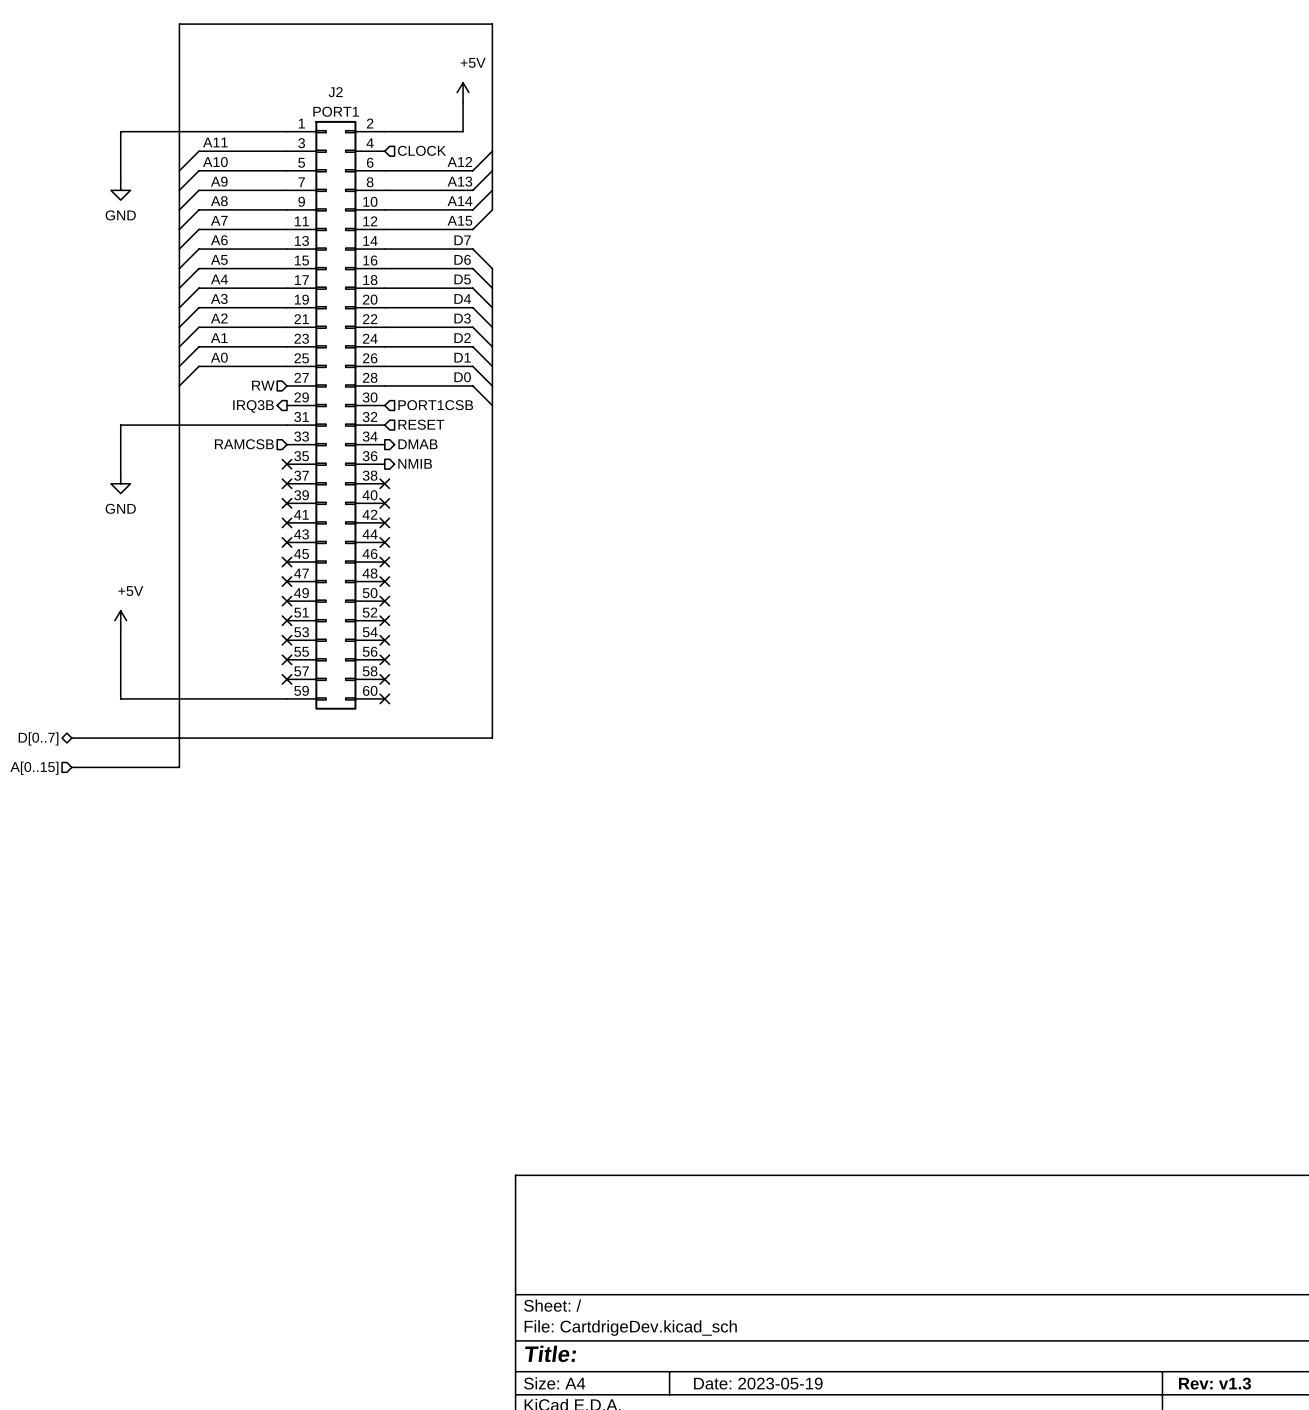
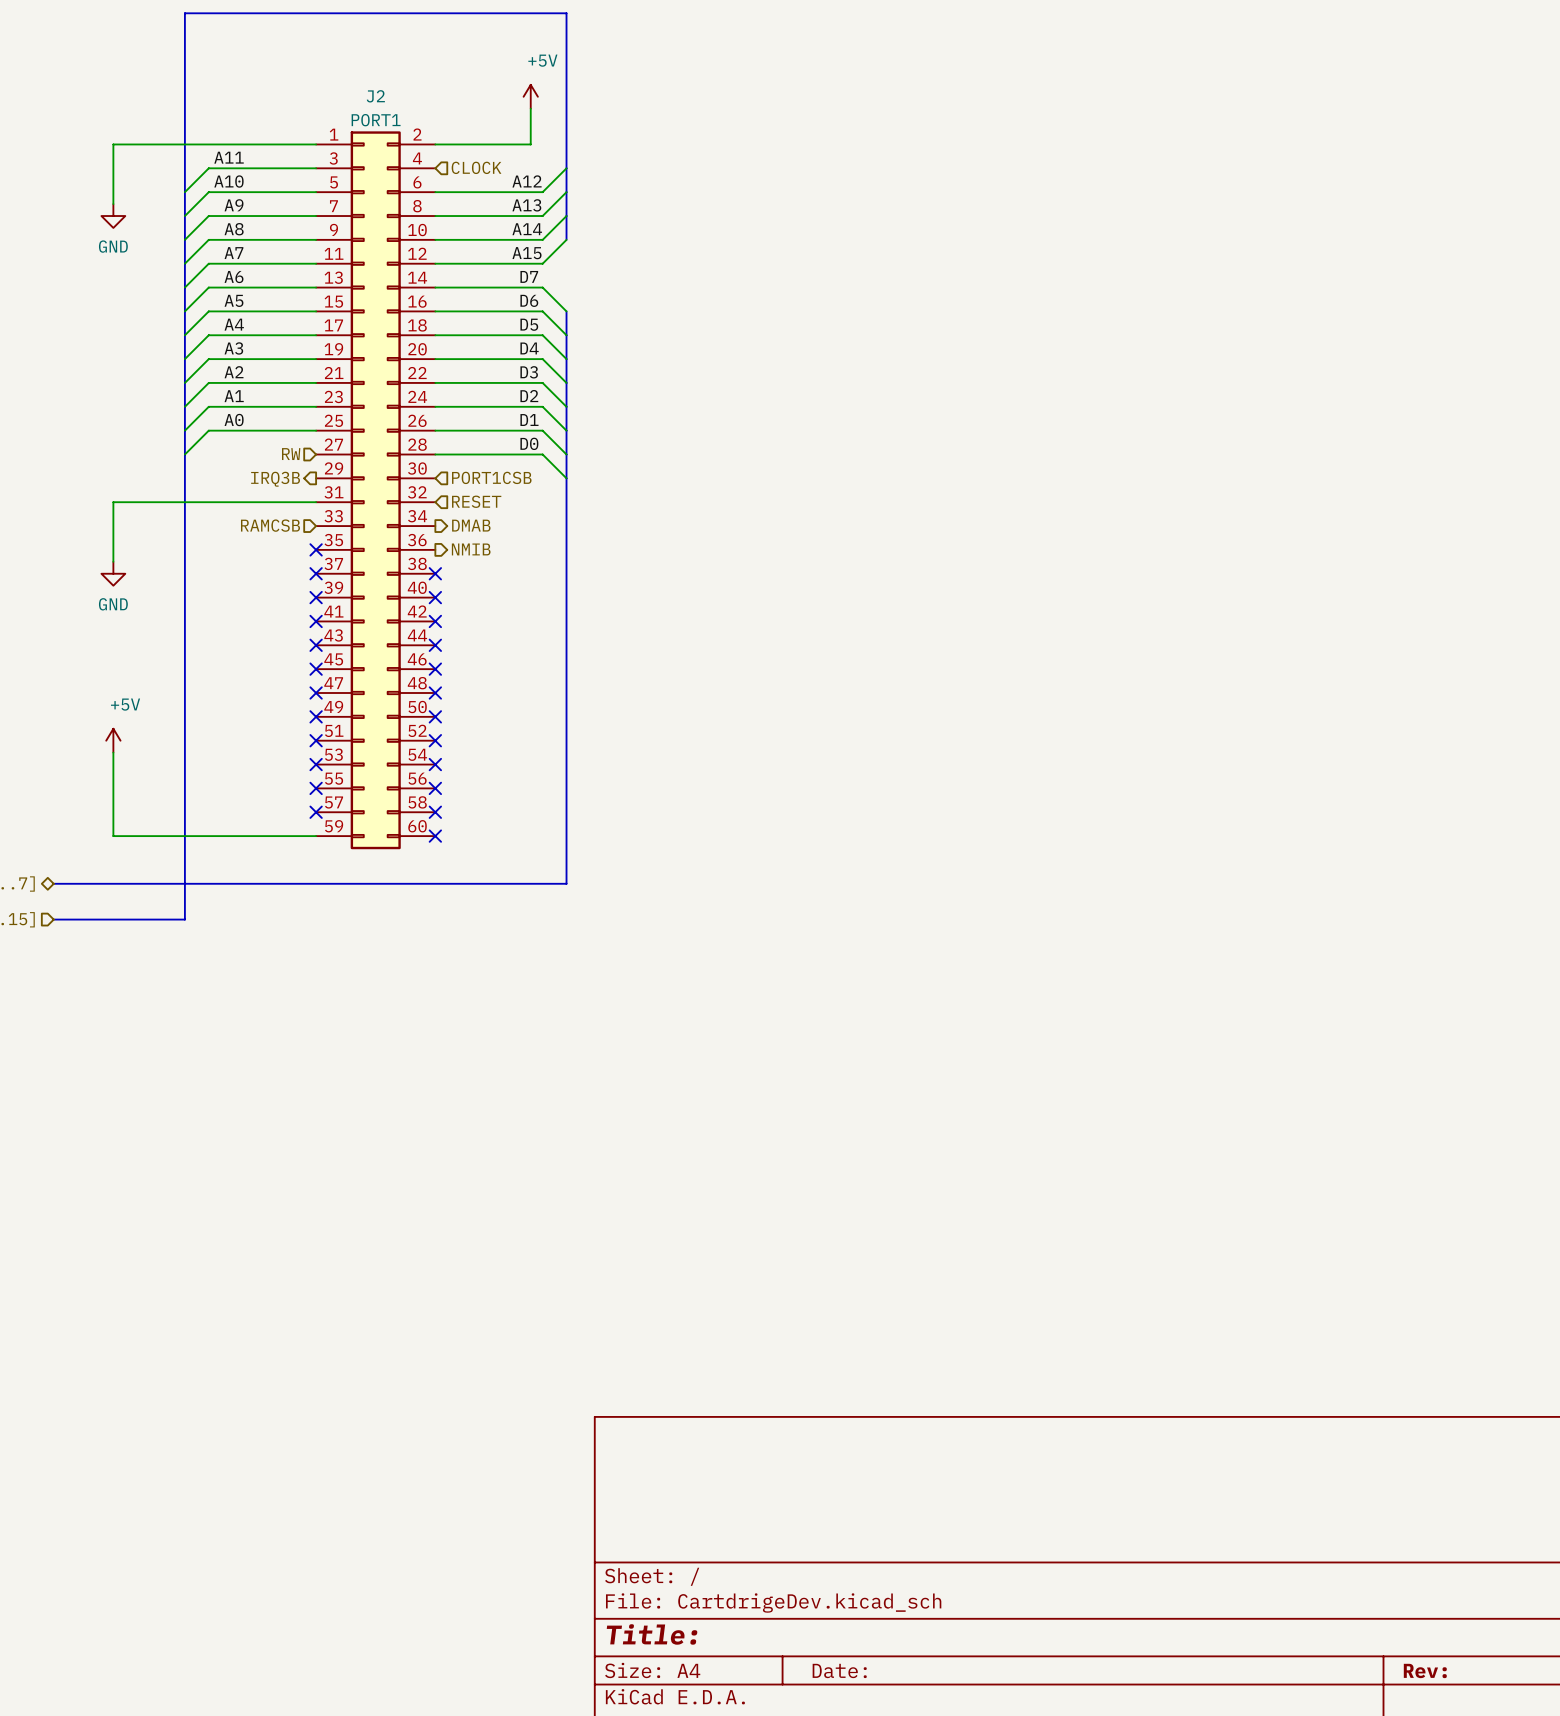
title block: Date: 2023-05-19 (758, 1383) -> Date: (839, 1670)
title block: Rev: v1.3 (1214, 1383) -> Rev: (1425, 1670)

